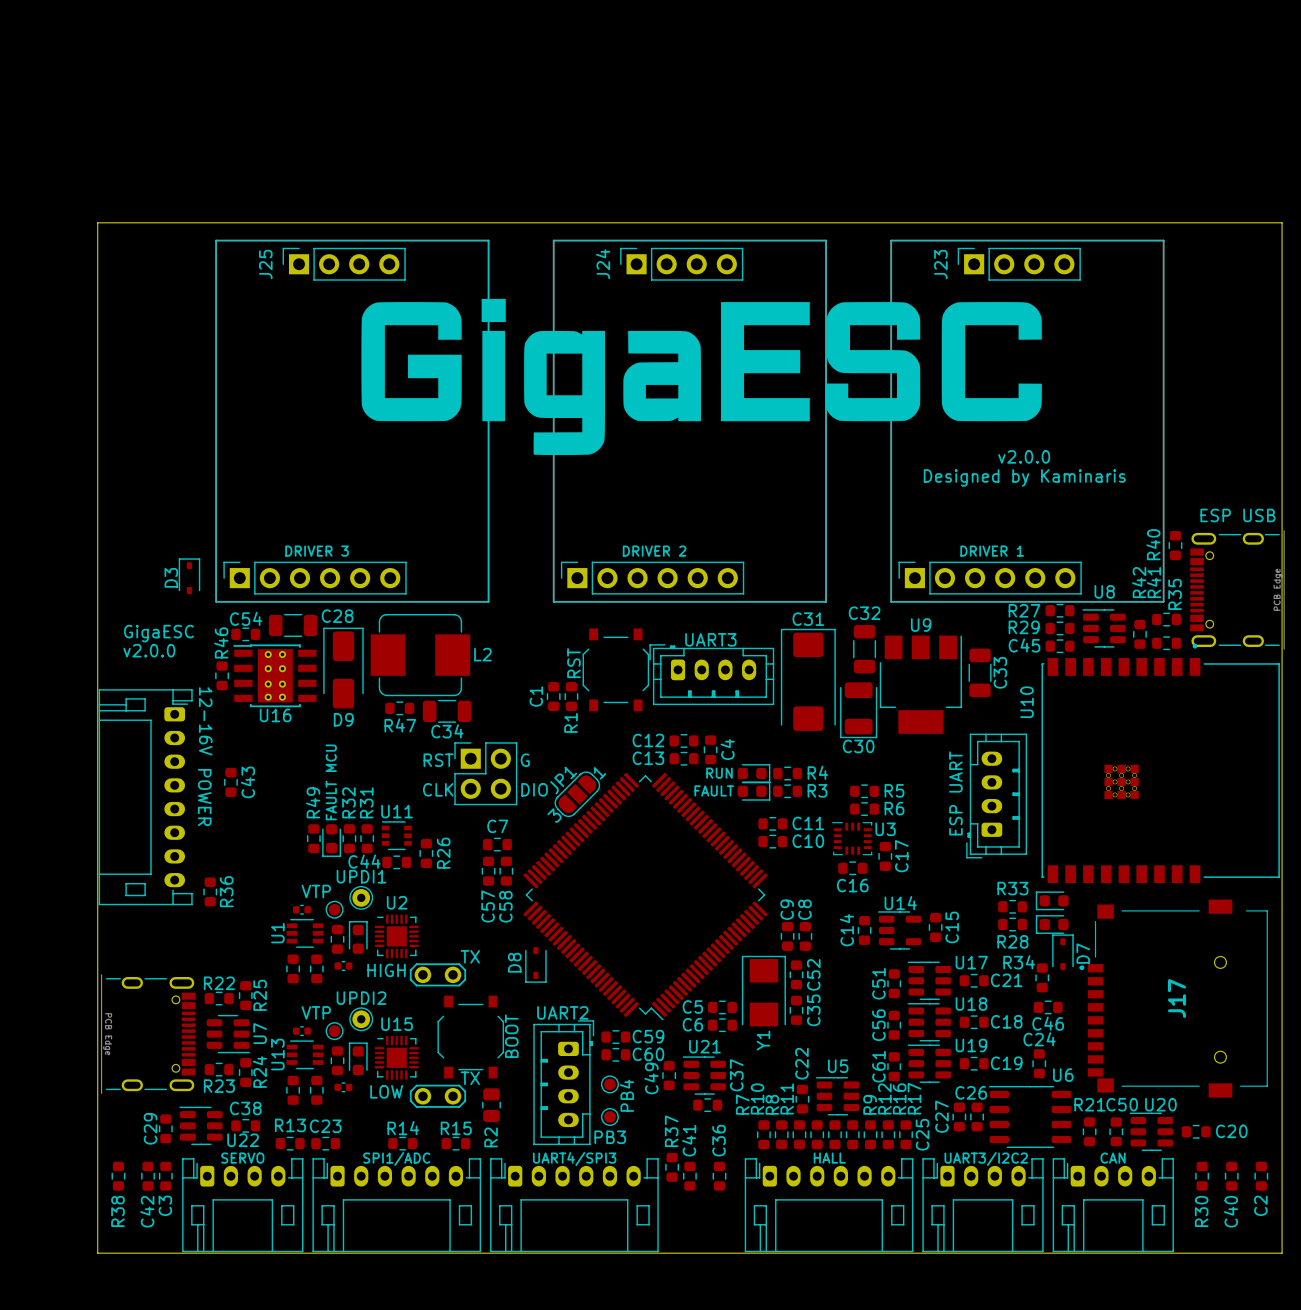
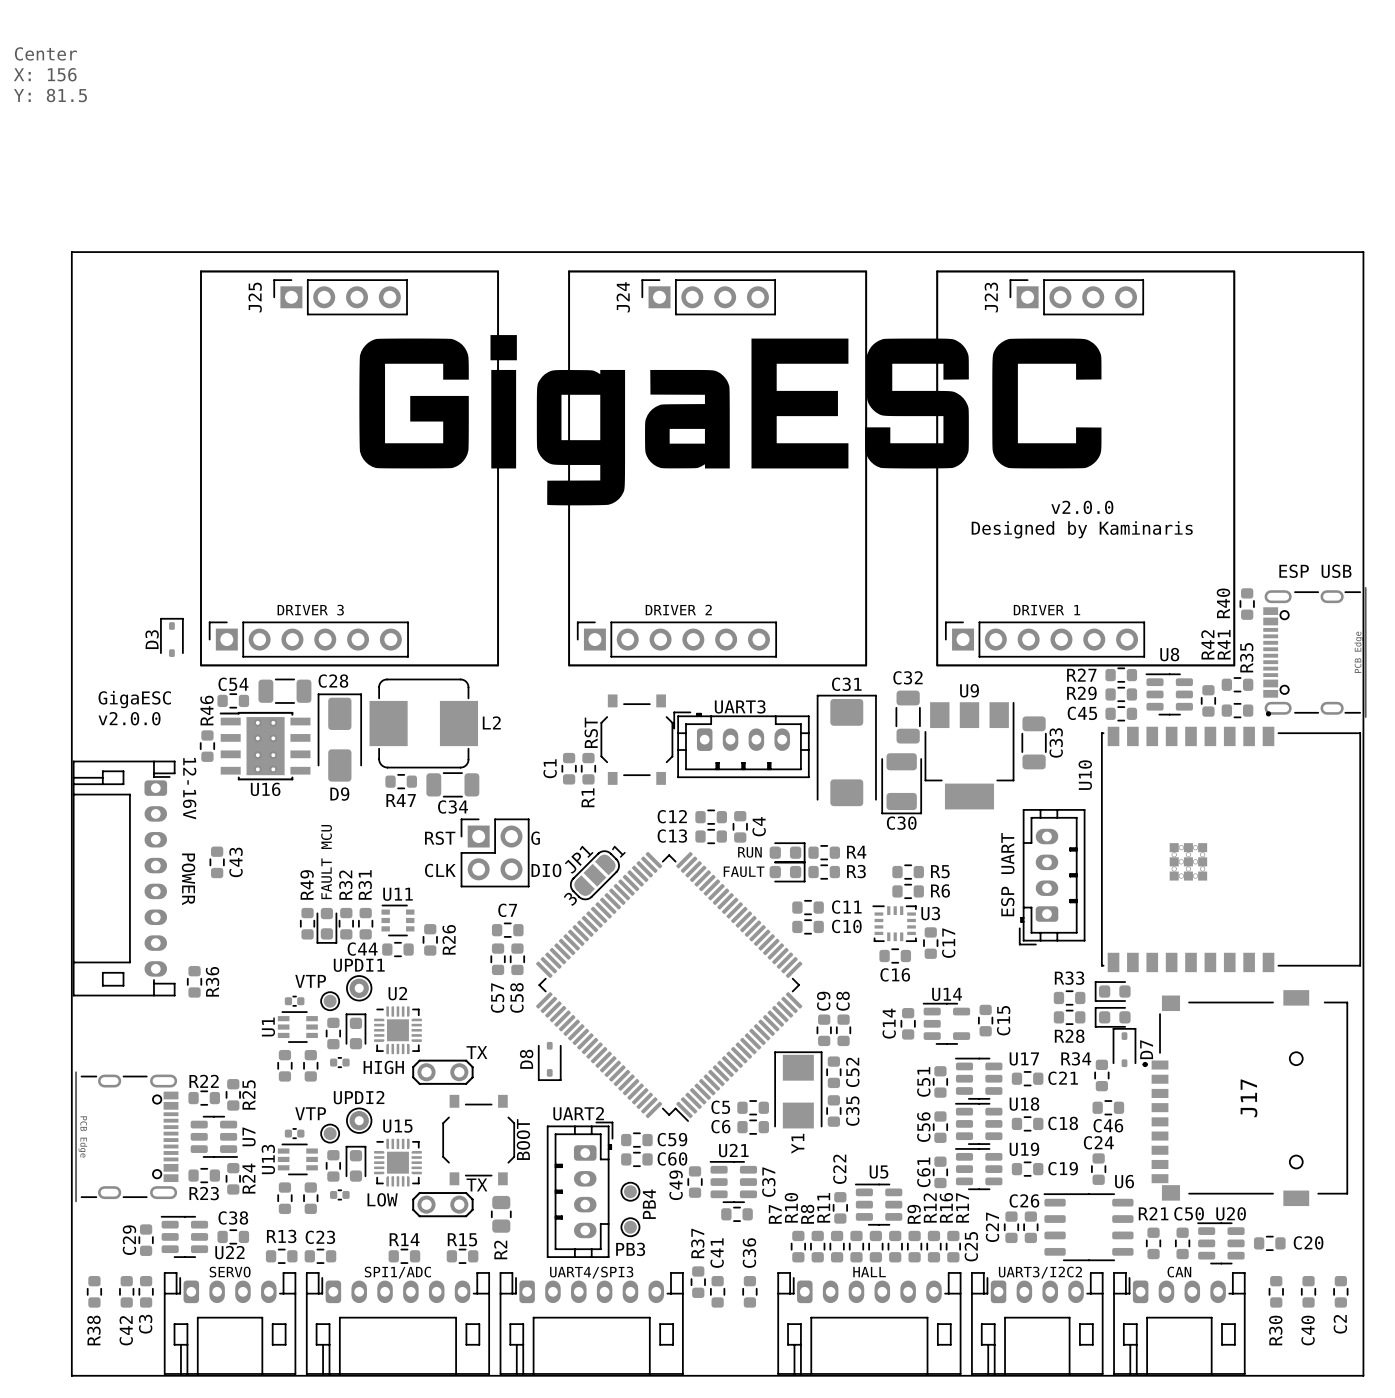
text: none -> Center (45, 53)
text: none -> X: 156 (45, 74)
text: none -> Y: 81.5 (50, 95)

